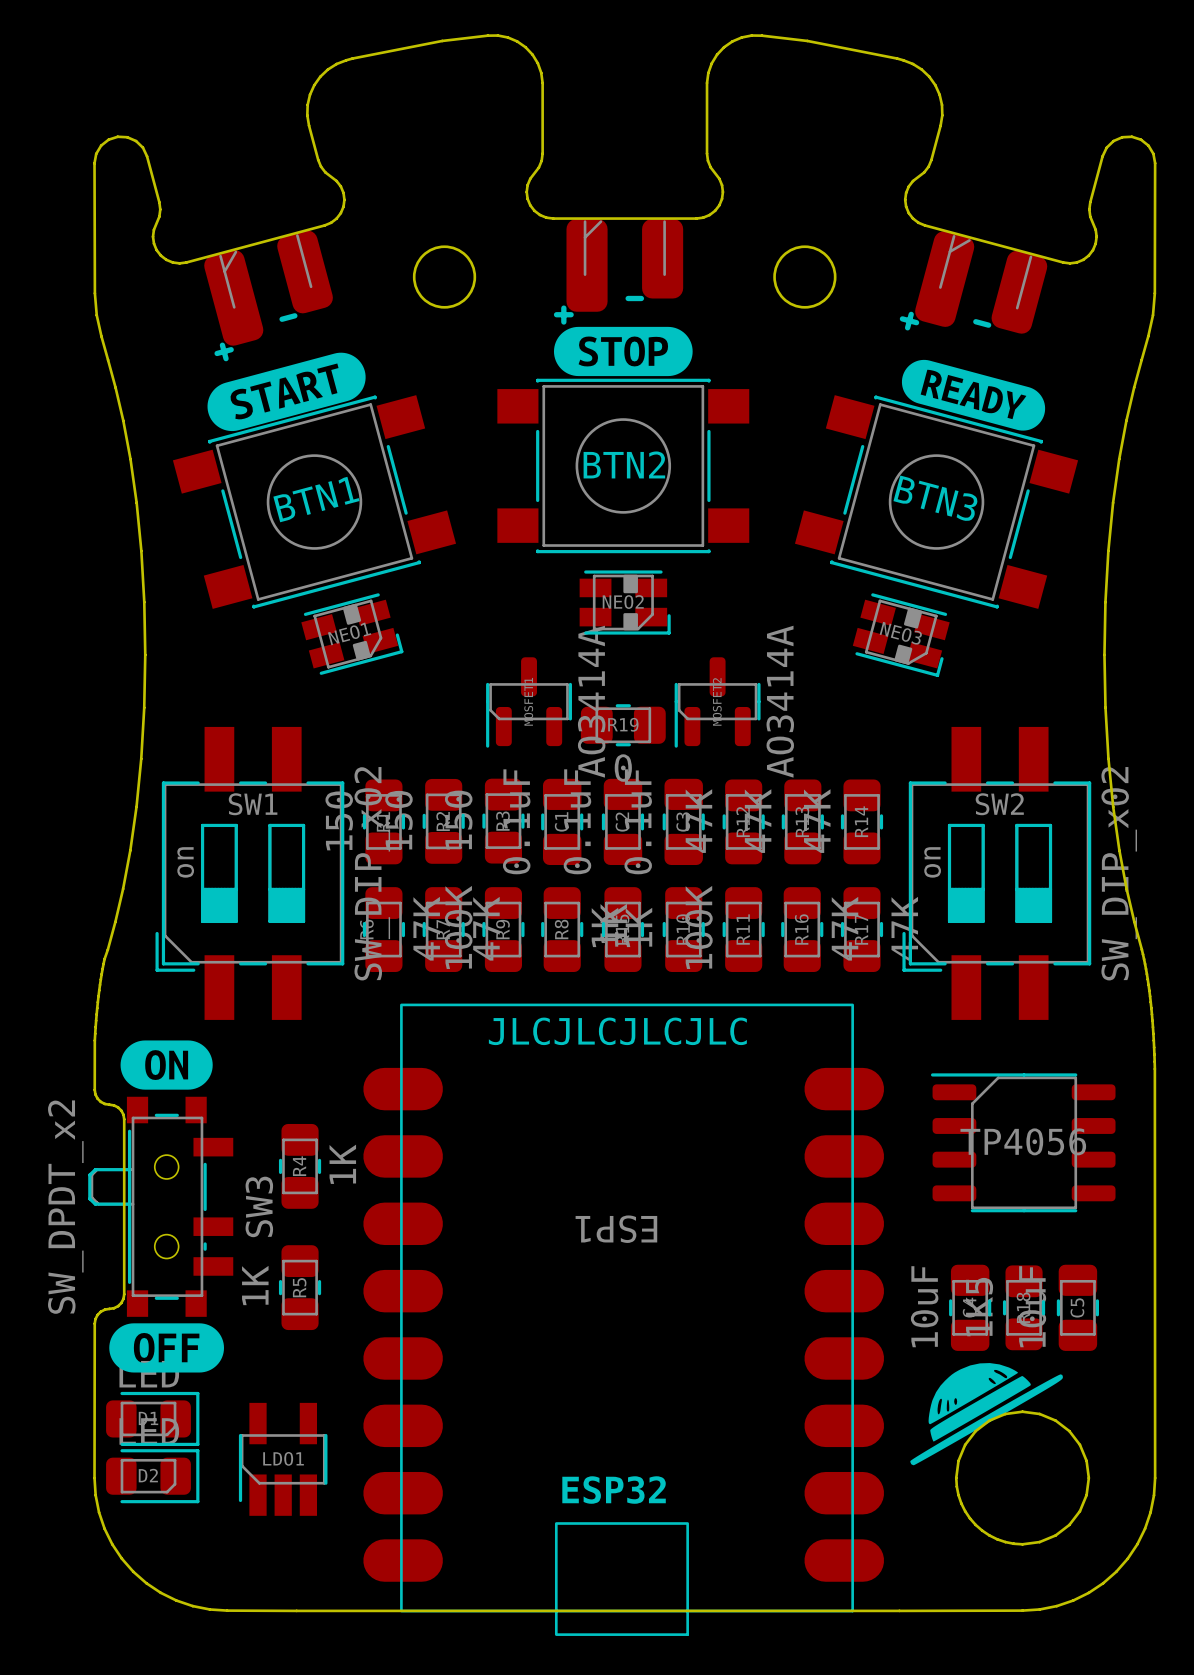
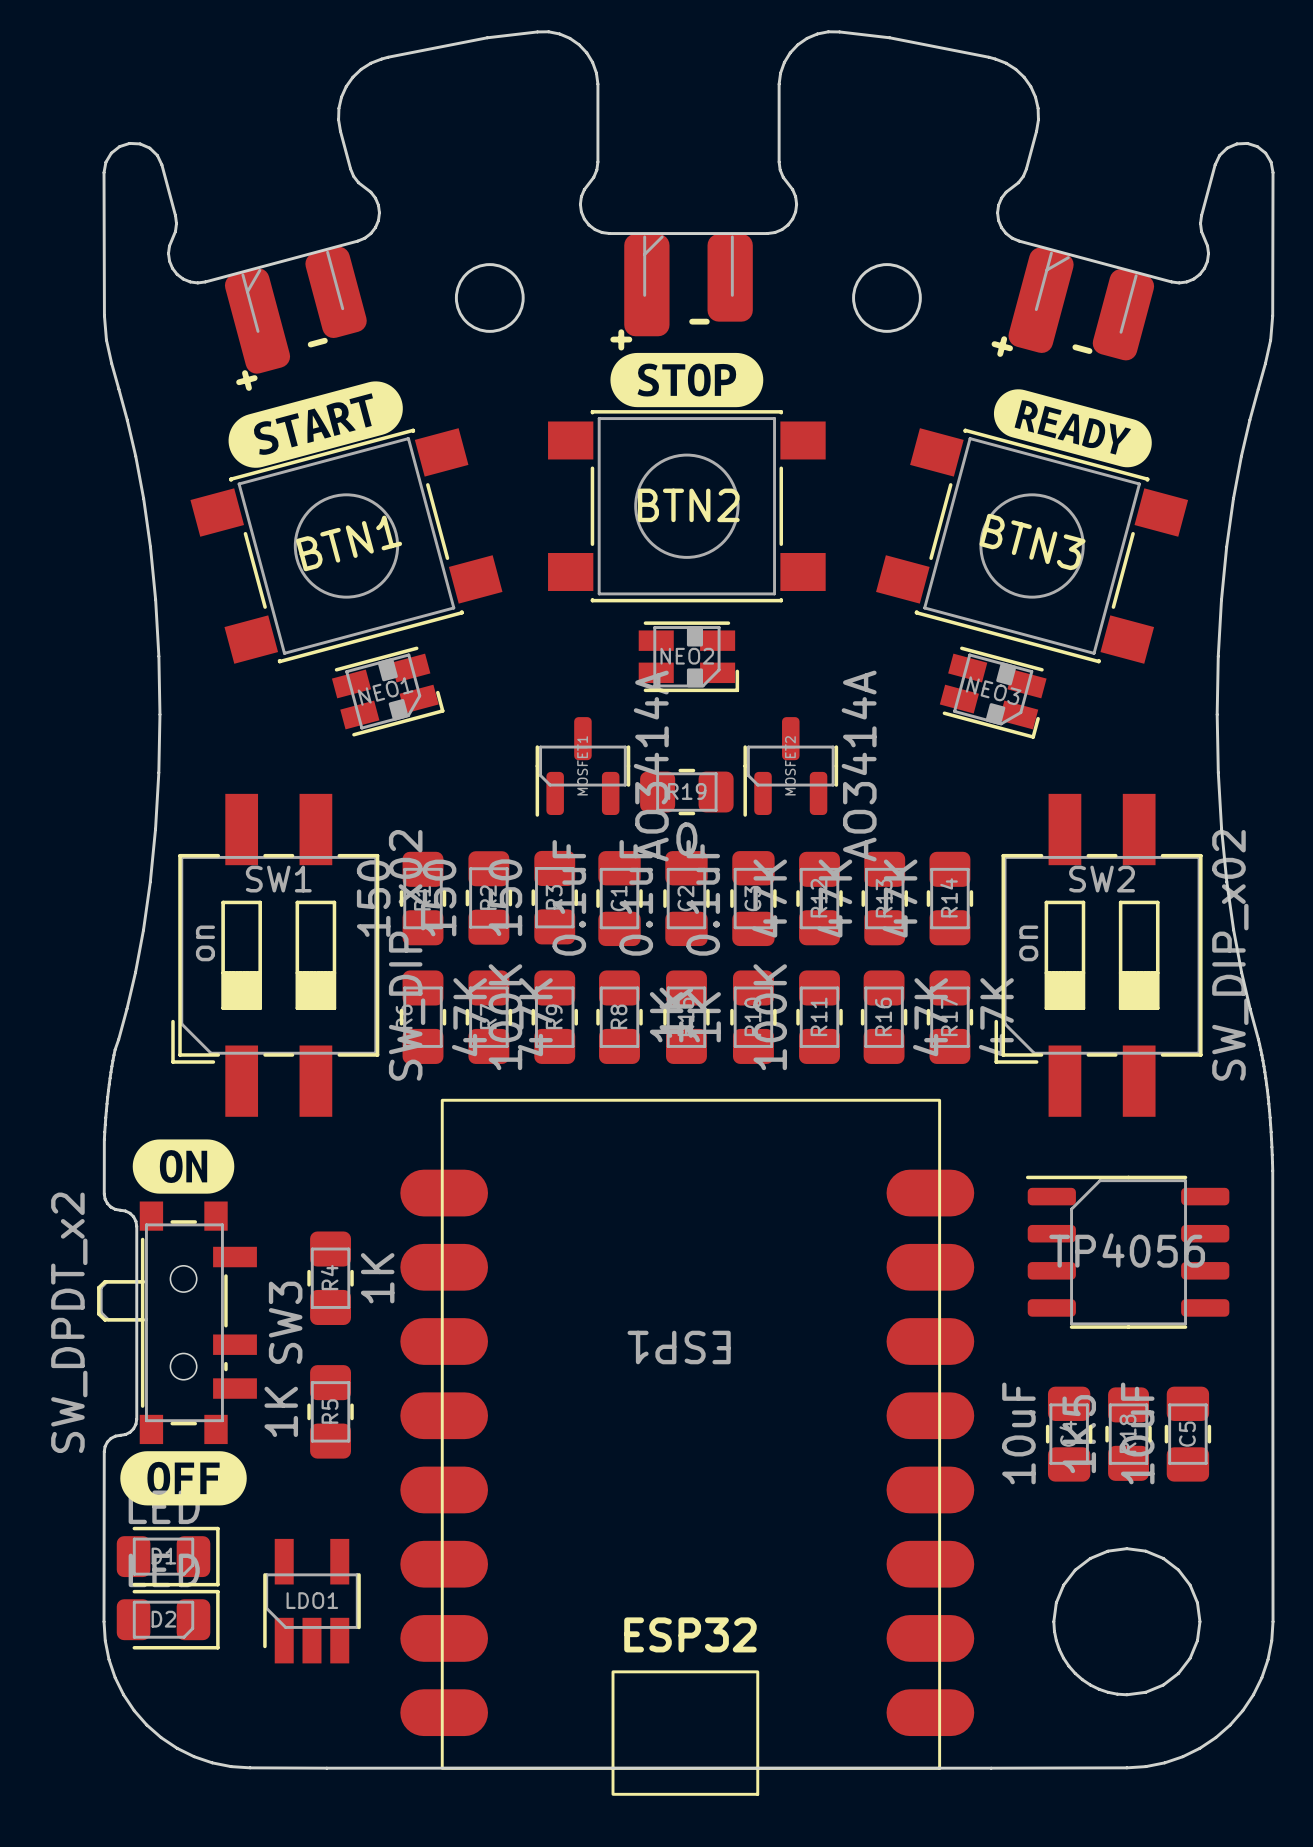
text: JLCJLCJLCJLC (617, 1031) -> none
drawing: [910, 1363, 1063, 1466] -> none

